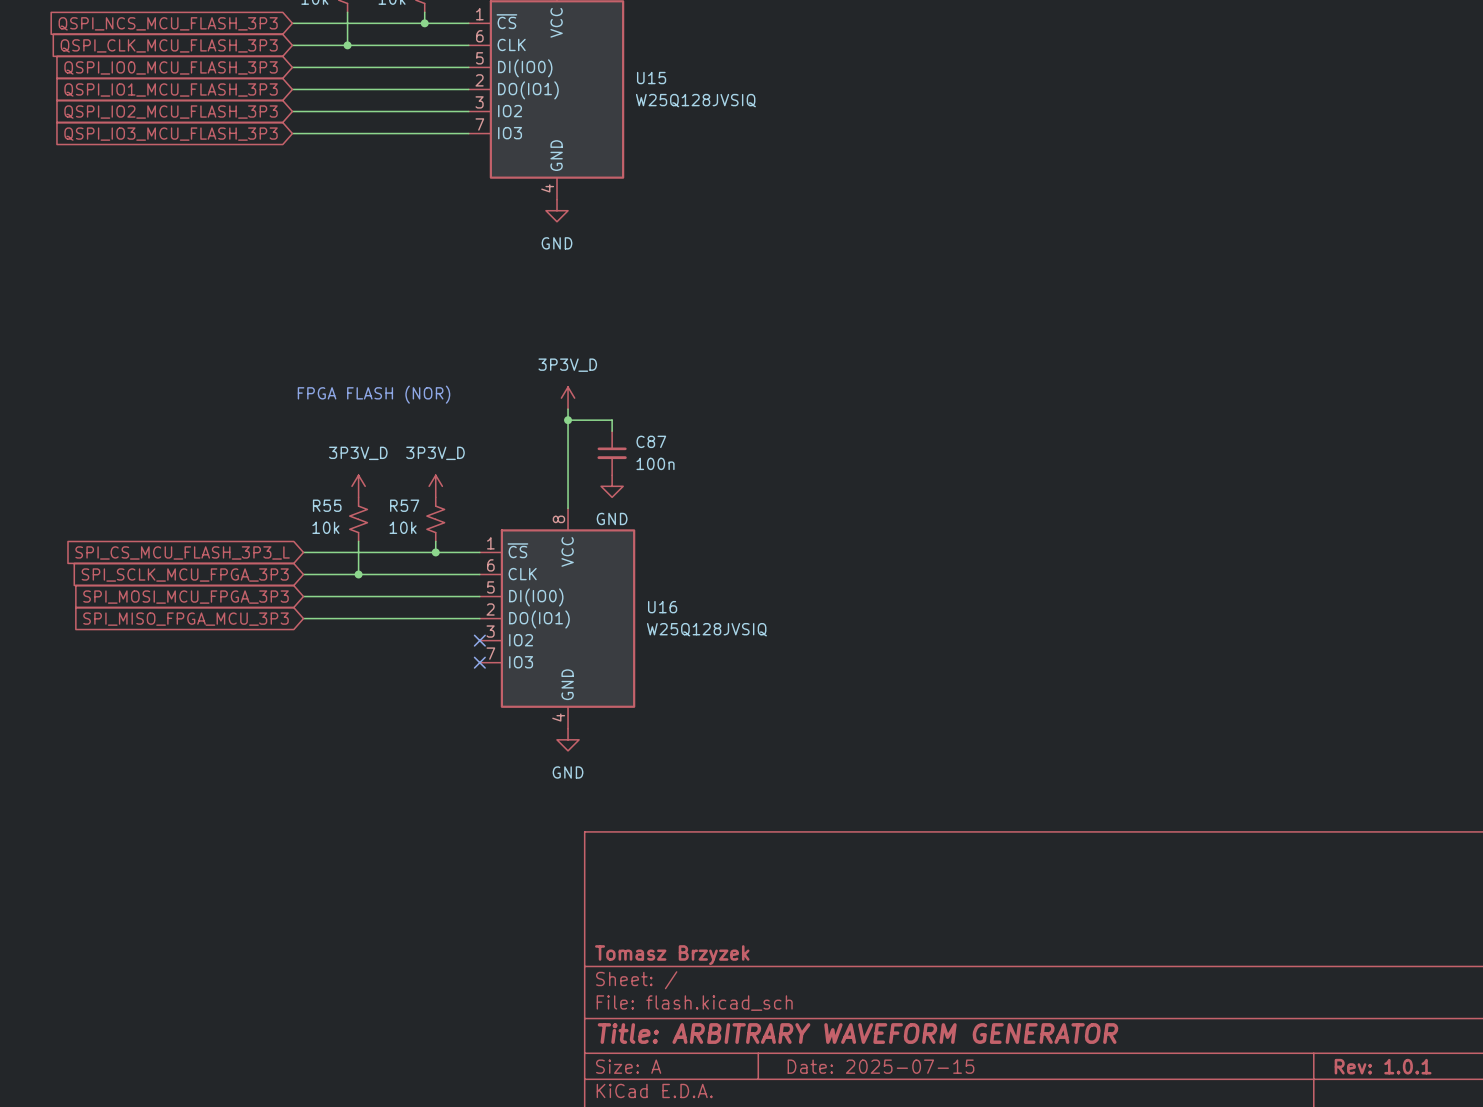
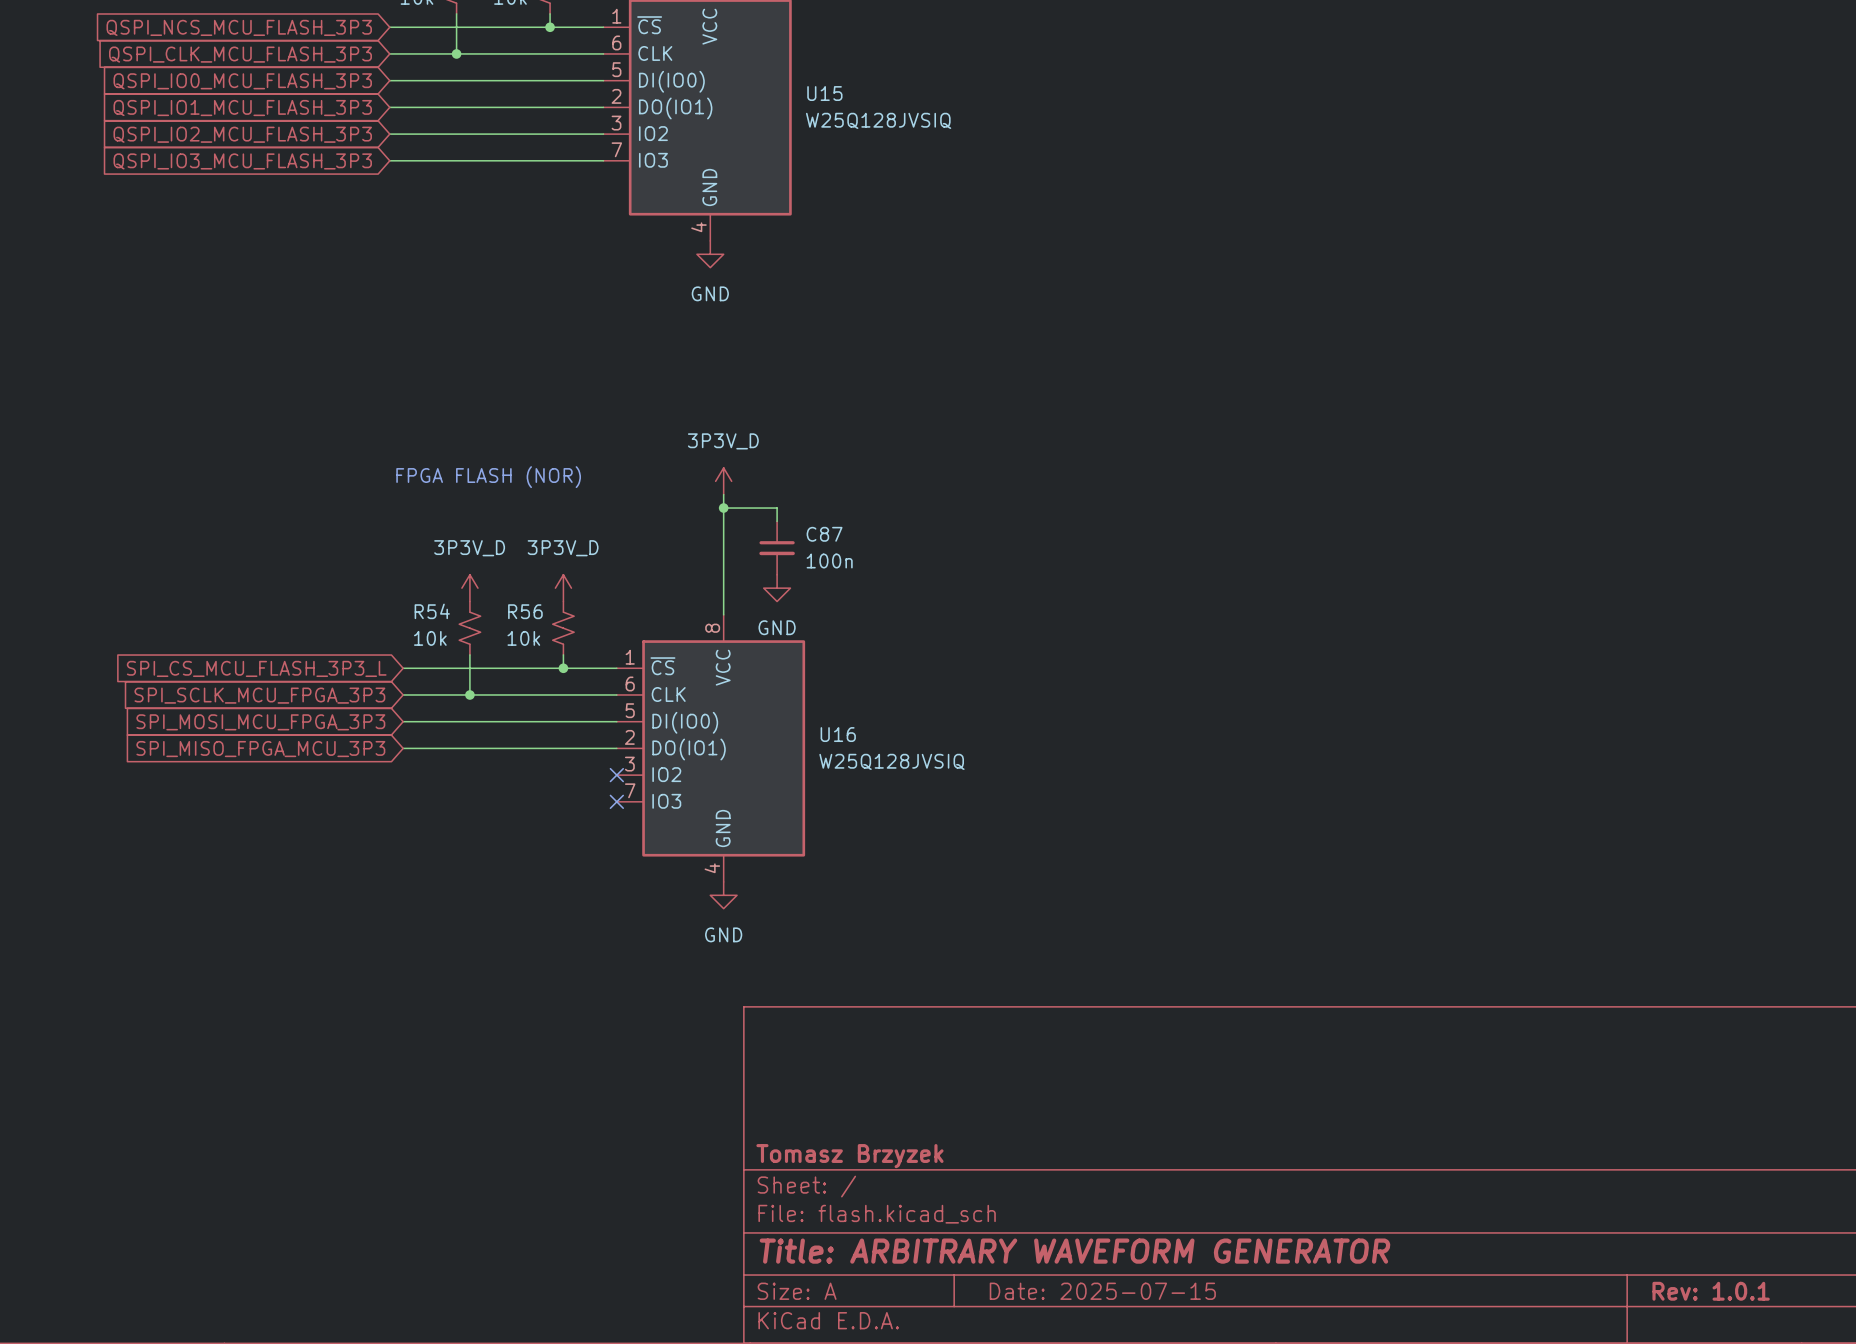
R55 name: R55 (327, 505) -> R54 (432, 611)
R57 name: R57 (404, 505) -> R56 (525, 611)

